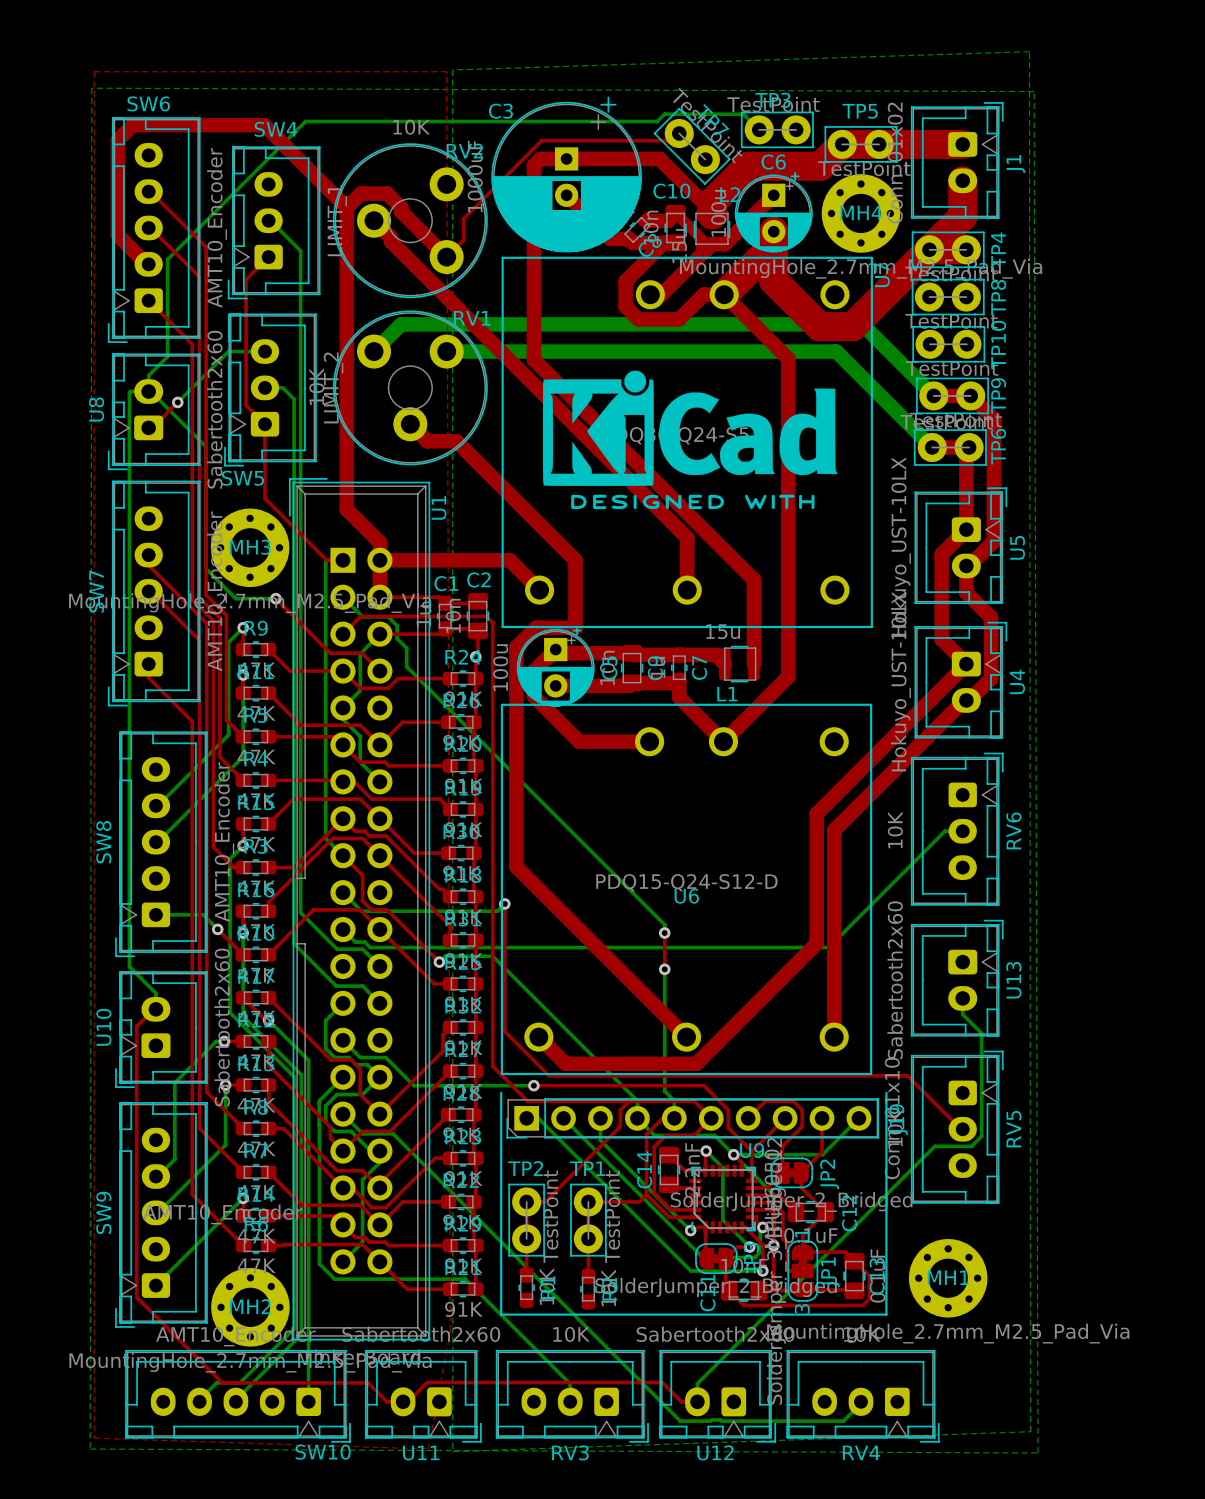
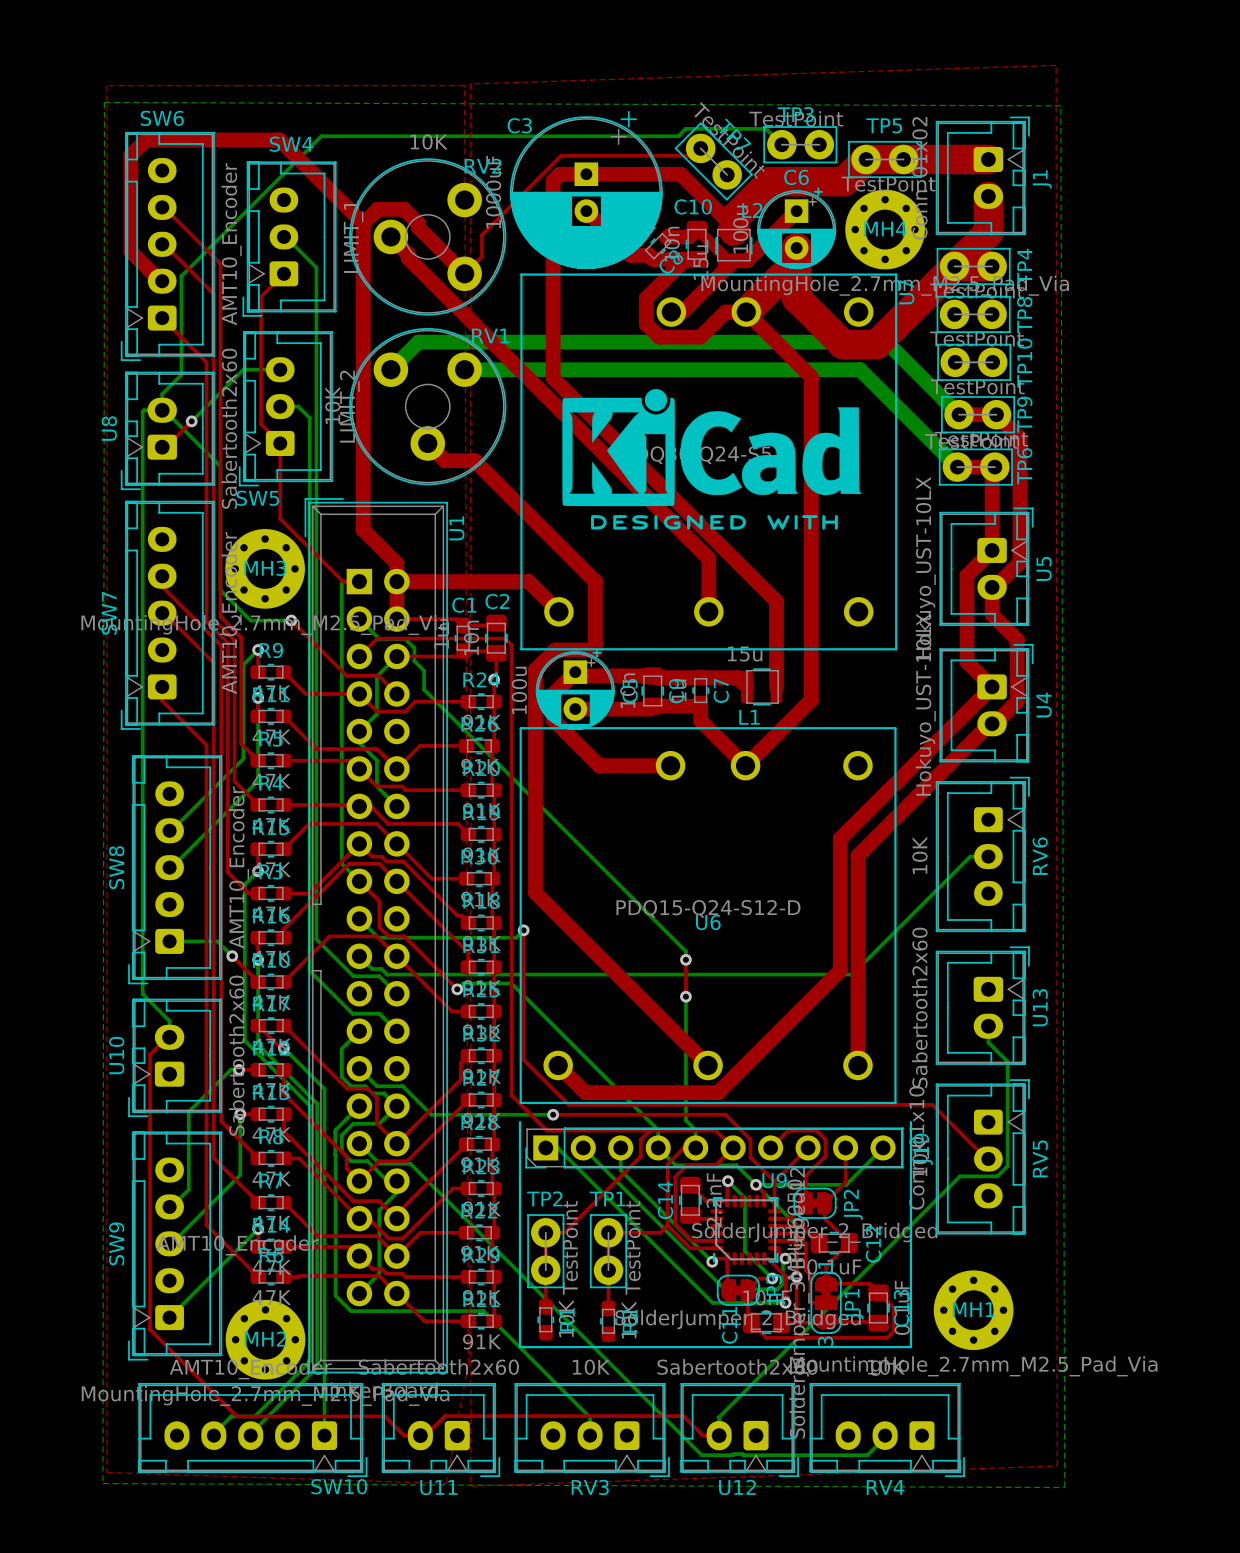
bottom zone outline: (1029, 51) (452, 69) (452, 1451) (1030, 1431) (1029, 51) -> none
top zone outline: none -> (1056, 65) (470, 83) (470, 1486) (1057, 1465) (1056, 65)

